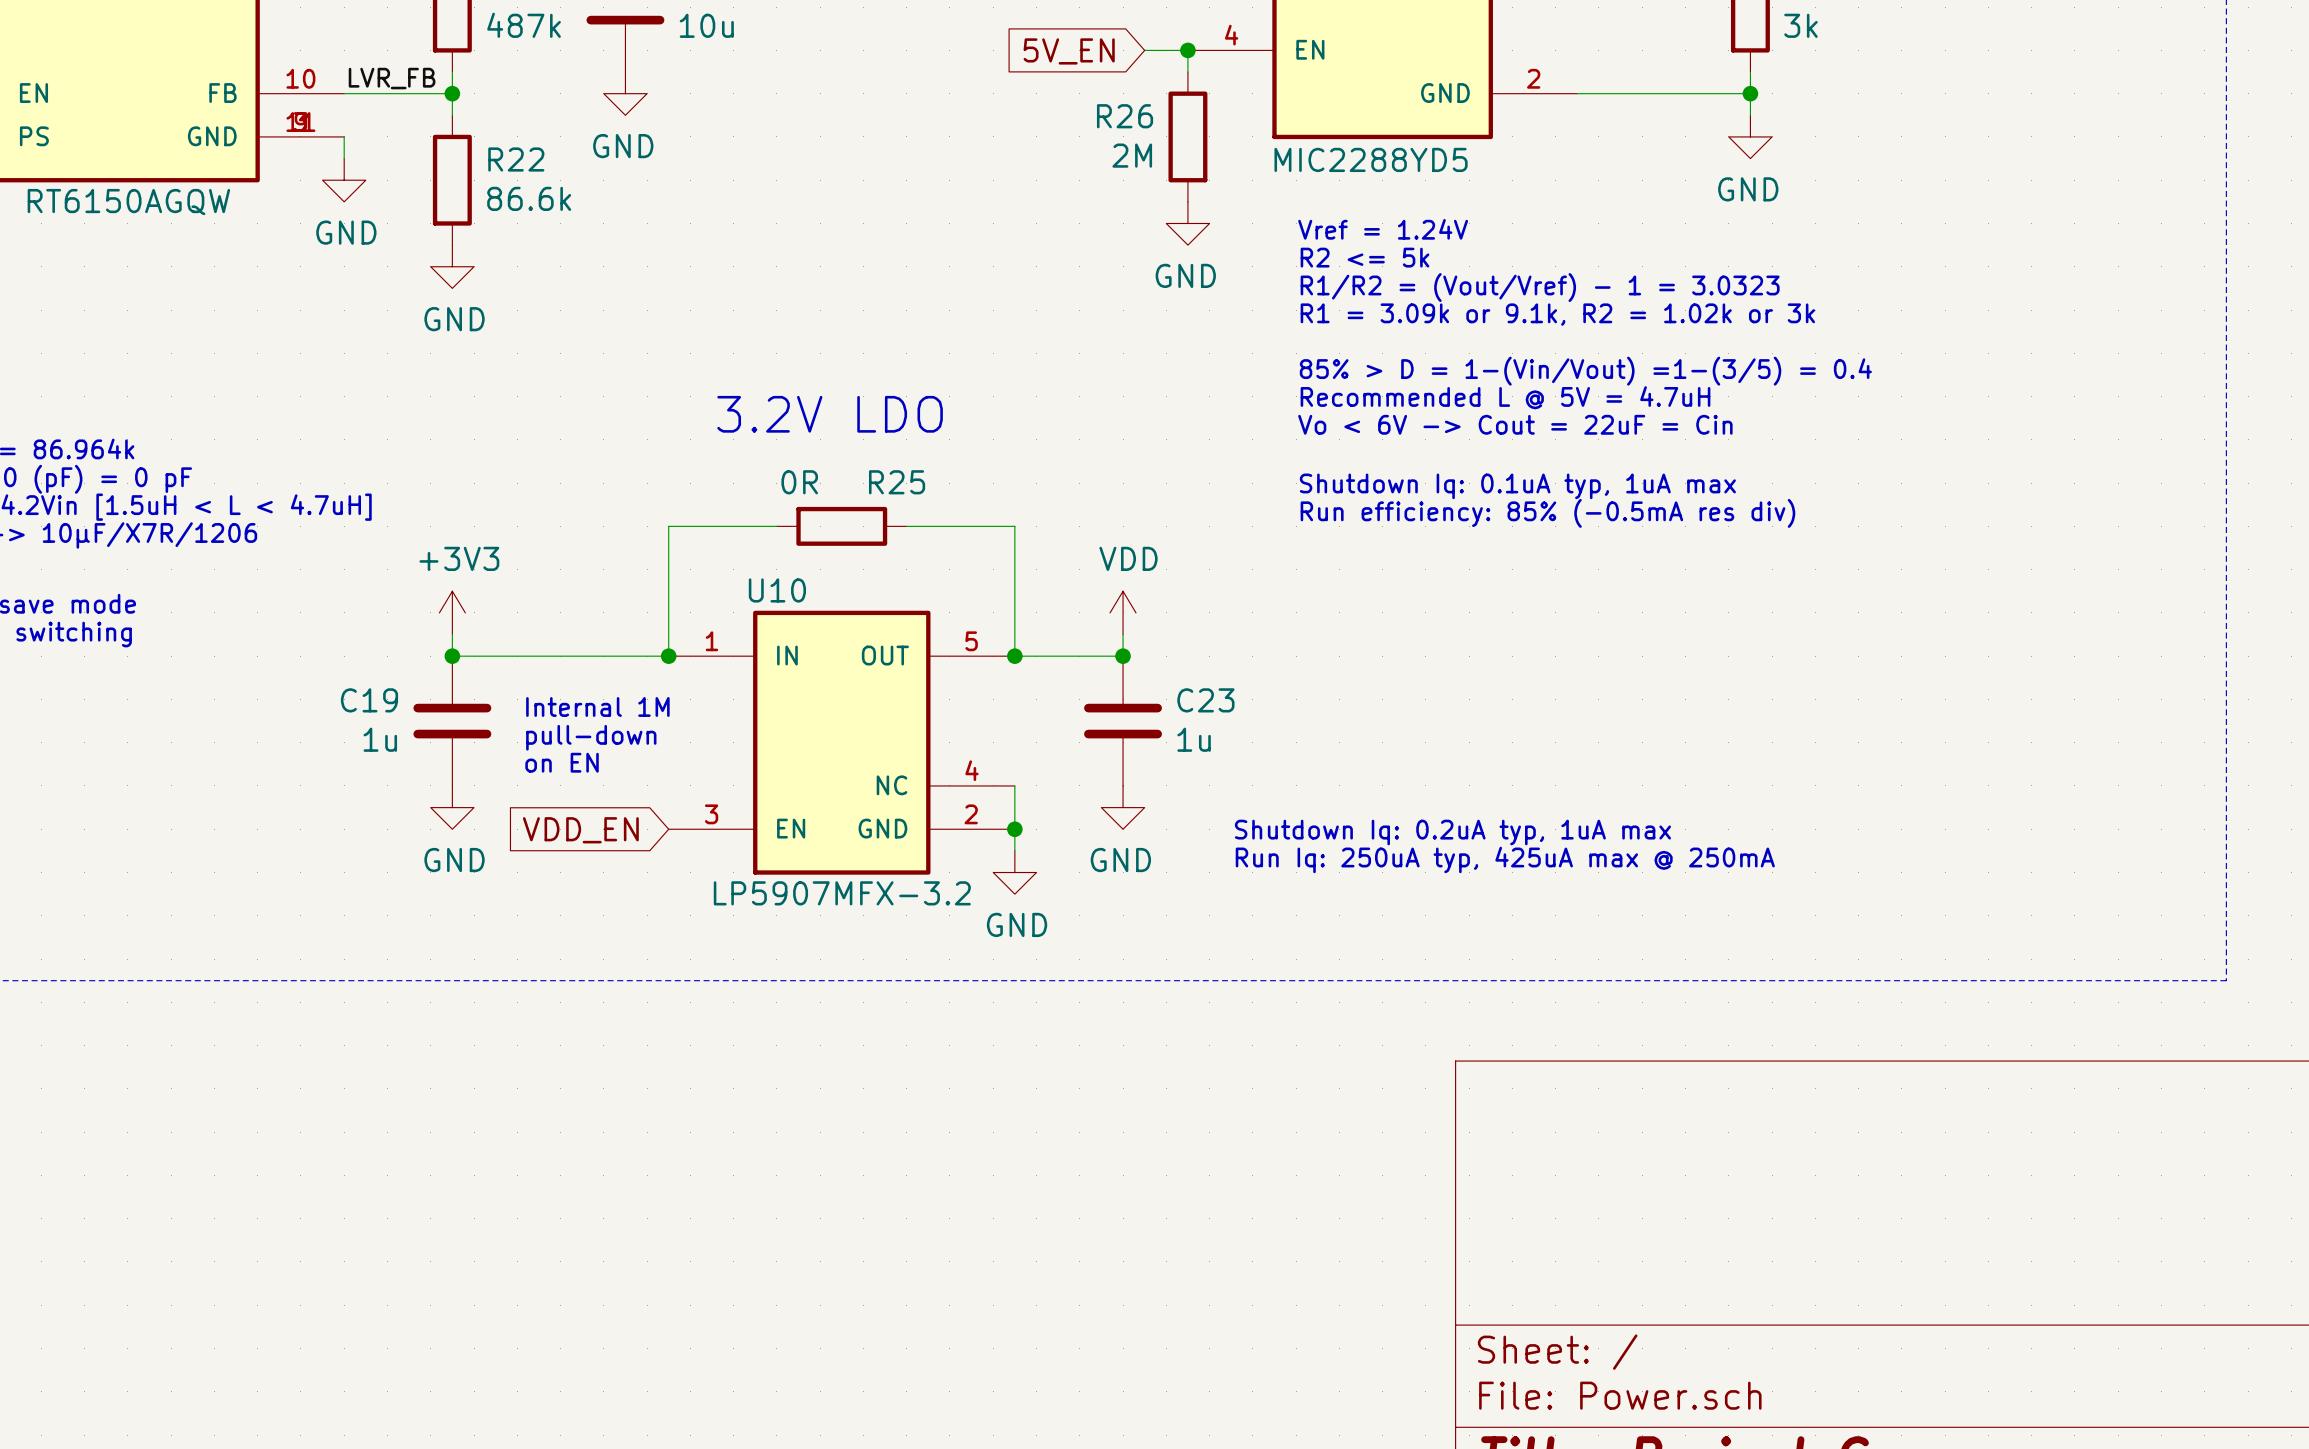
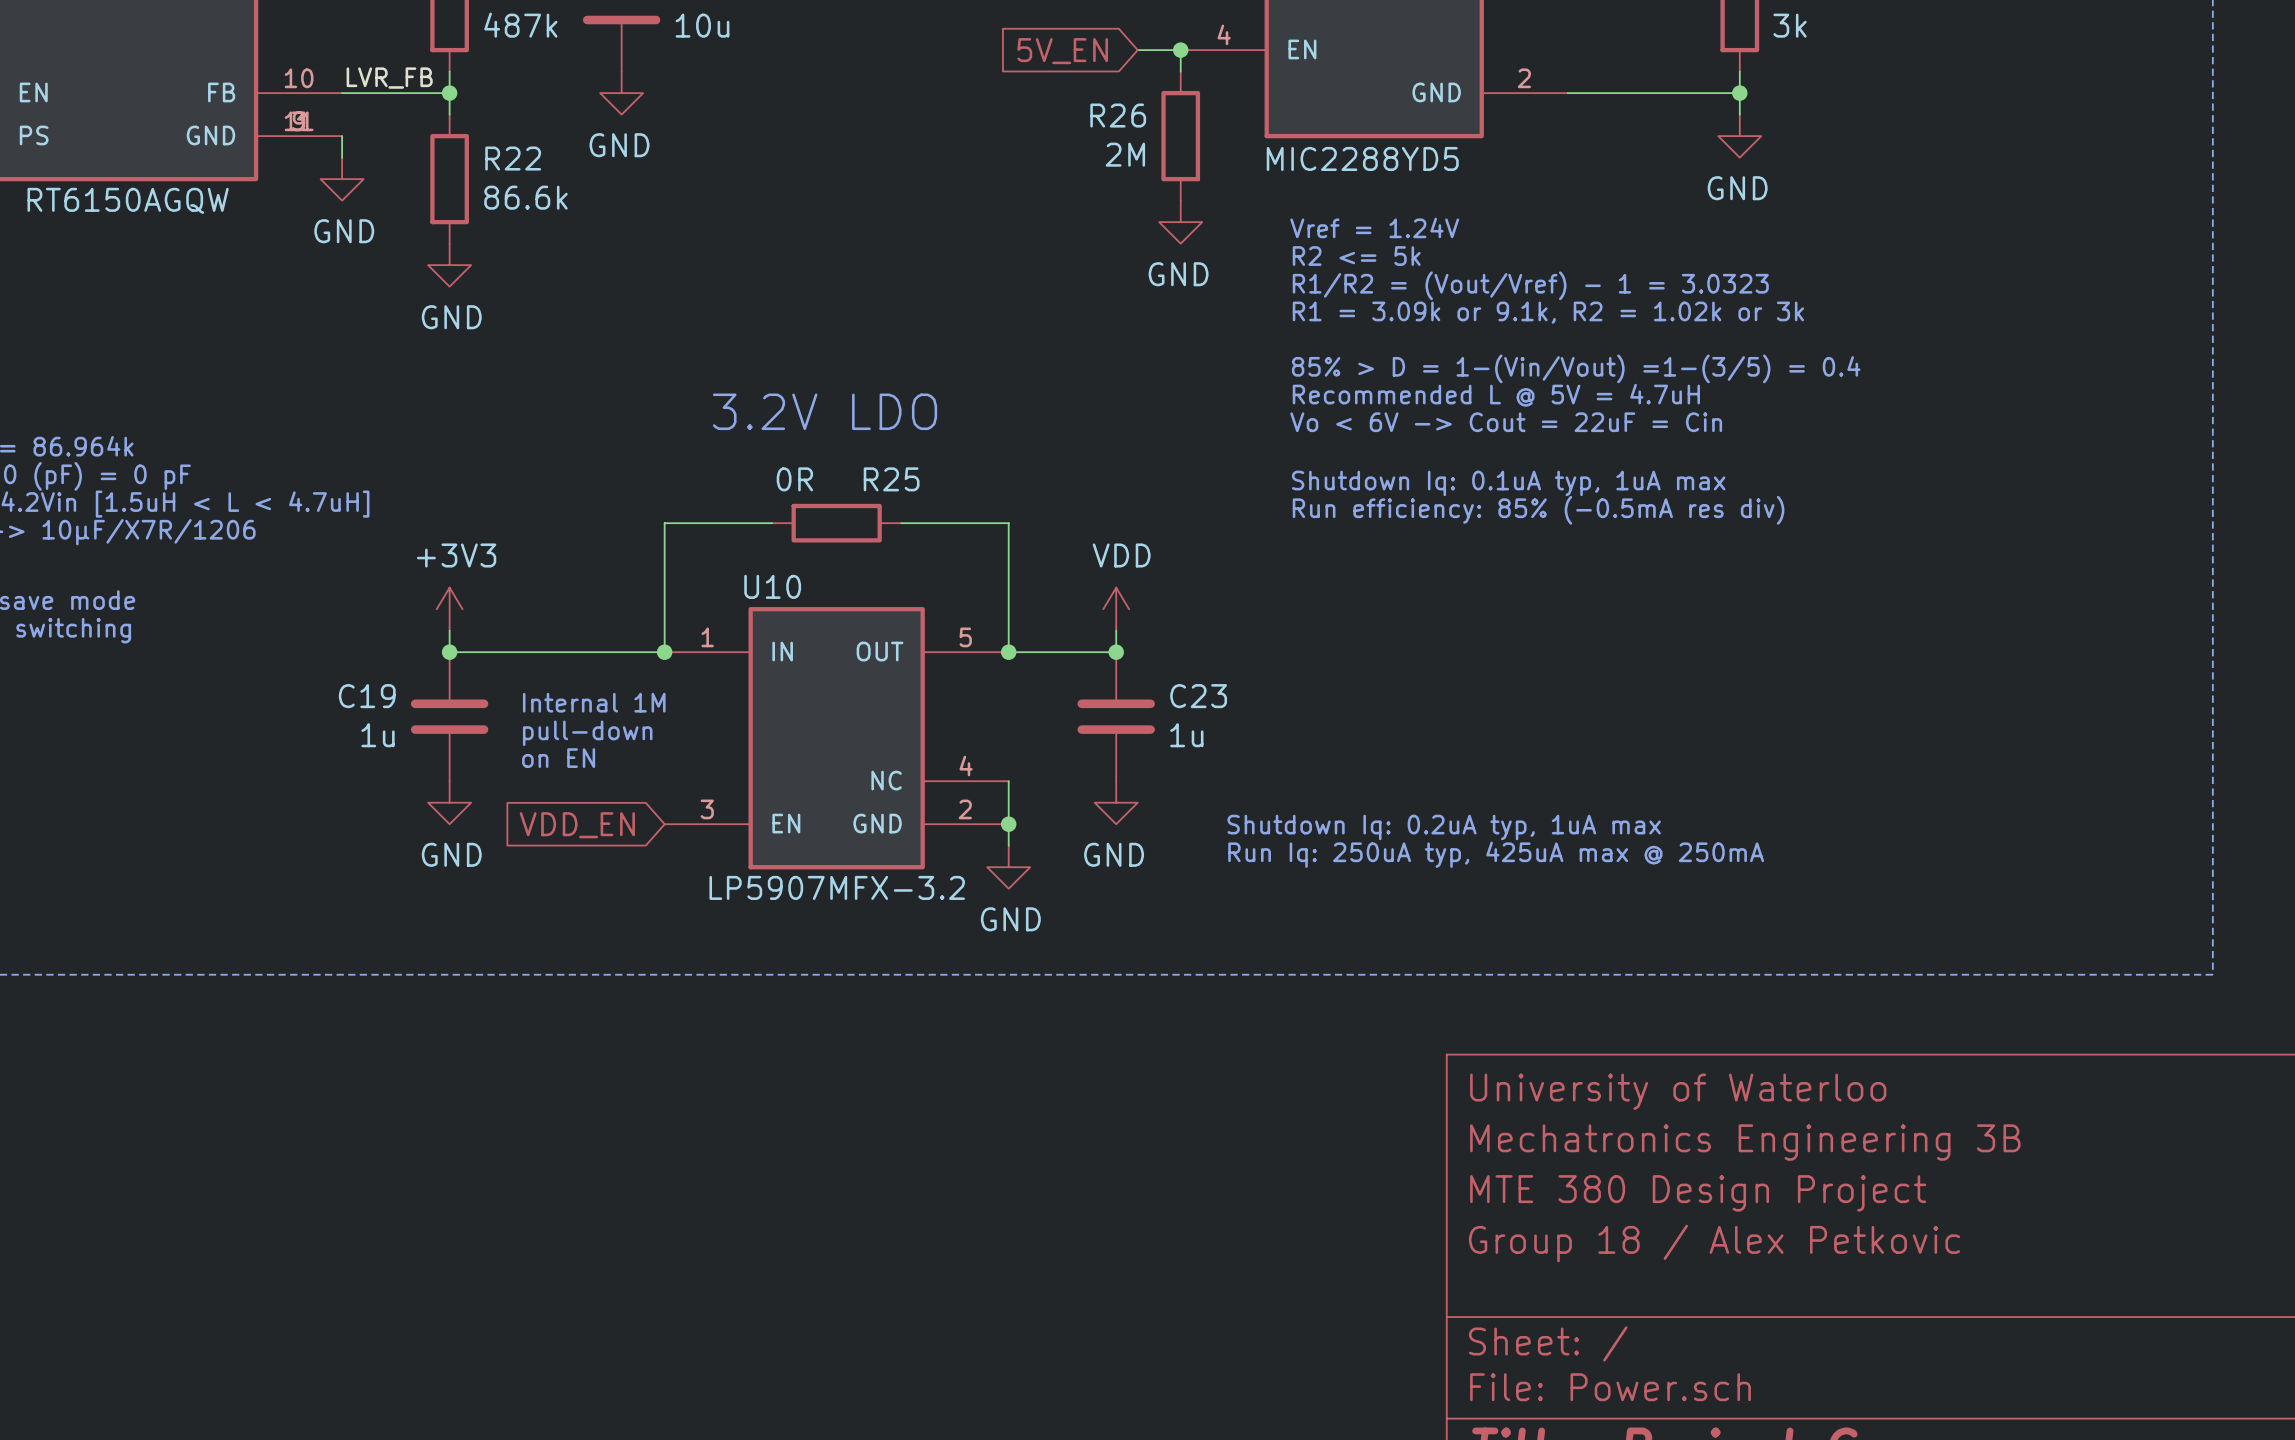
title block: none -> University of Waterloo (1678, 1091)
title block: none -> Mechatronics Engineering 3B (1745, 1142)
title block: none -> MTE 380 Design Project (1698, 1193)
title block: none -> Group 18 / Alex Petkovic (1714, 1243)

